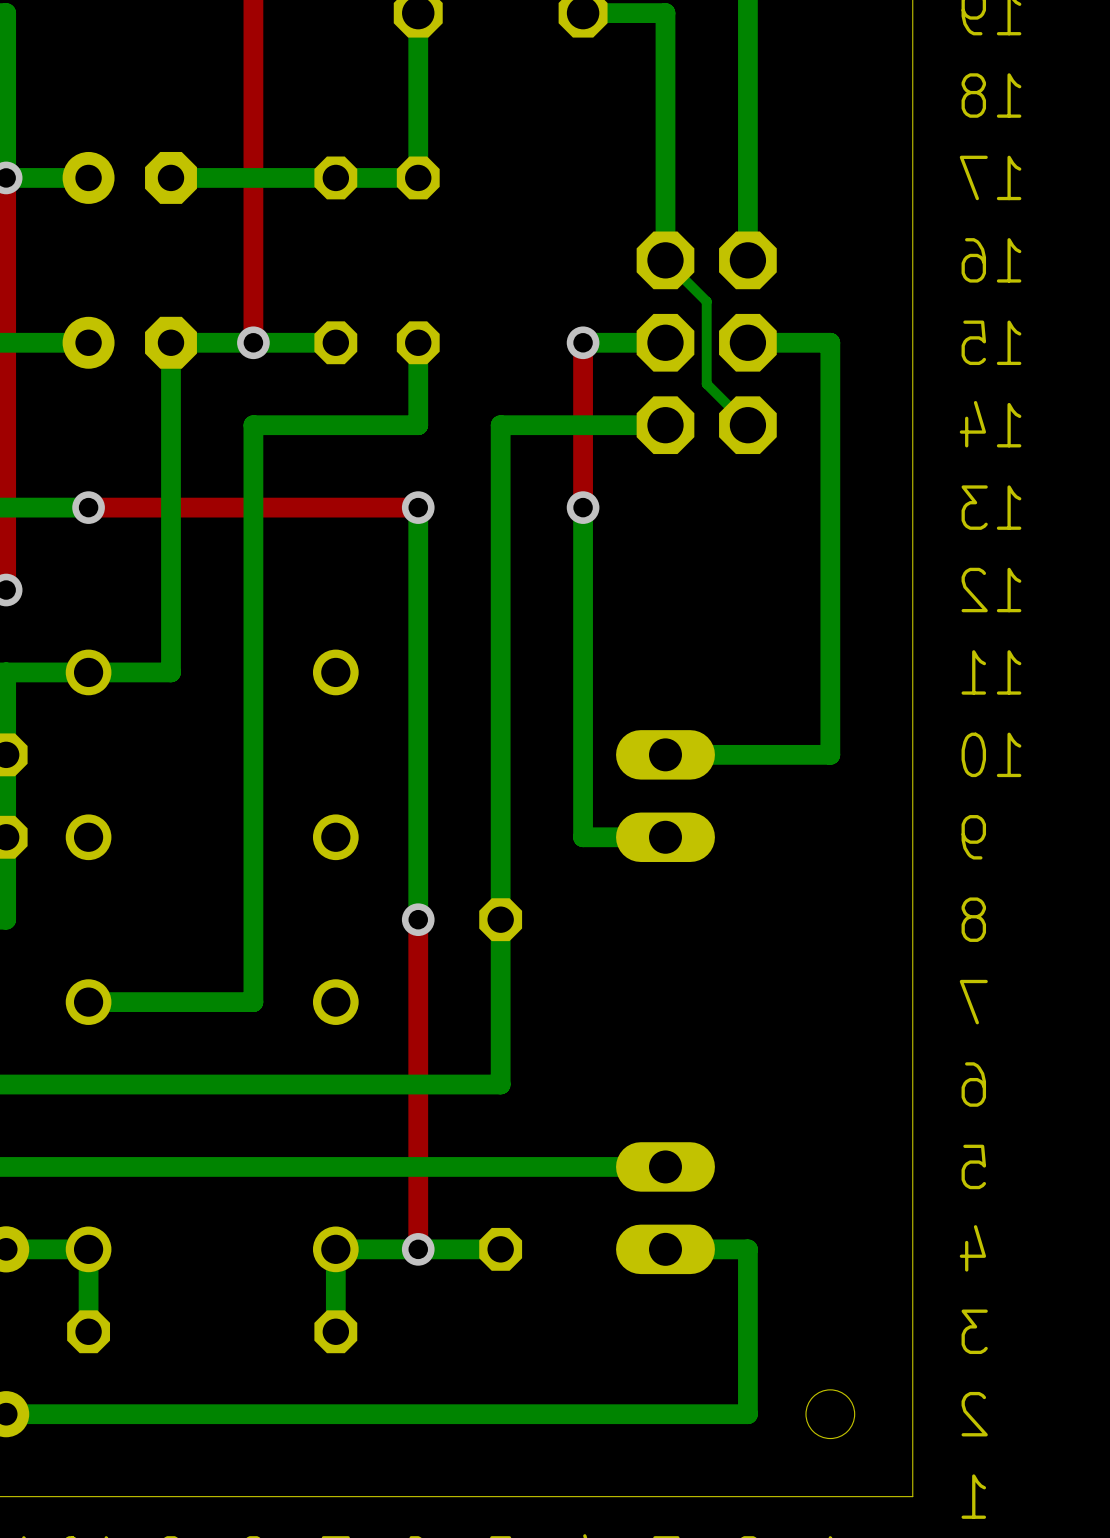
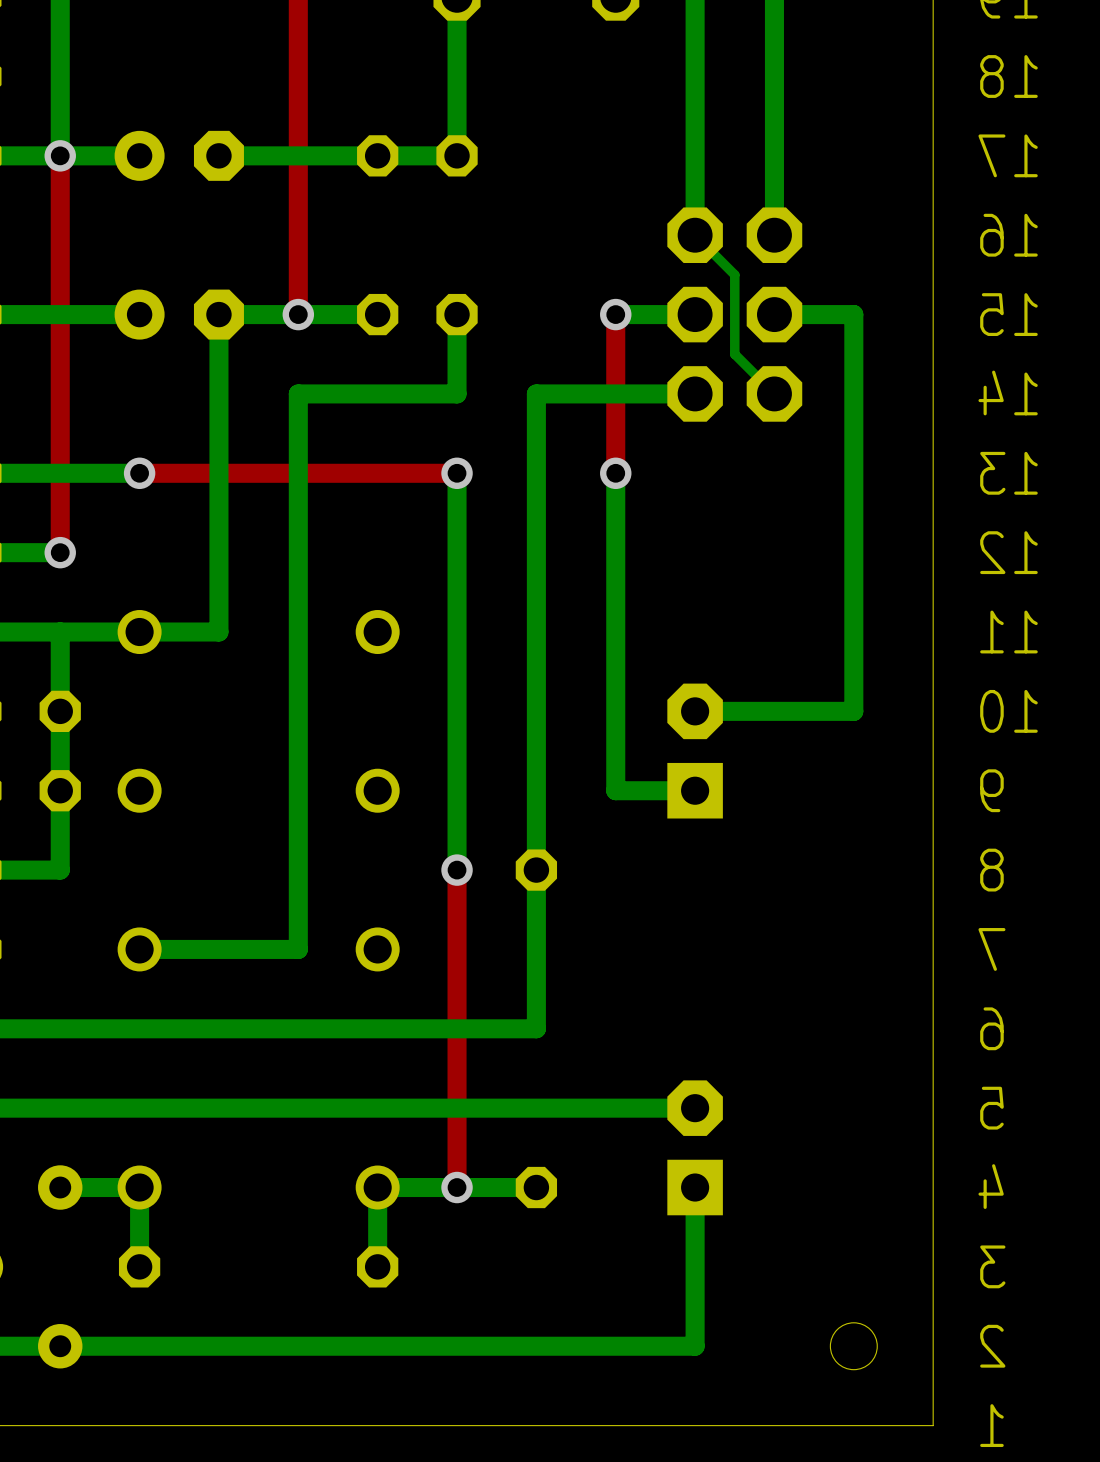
part footprint: [616, 730, 715, 863] -> [667, 683, 723, 819]
part footprint: [616, 1142, 715, 1275] -> [667, 1080, 723, 1216]
bottom track: (665, 1249) (747, 1249) (747, 1414) (665, 1414) -> (695, 1187) (695, 1346)

